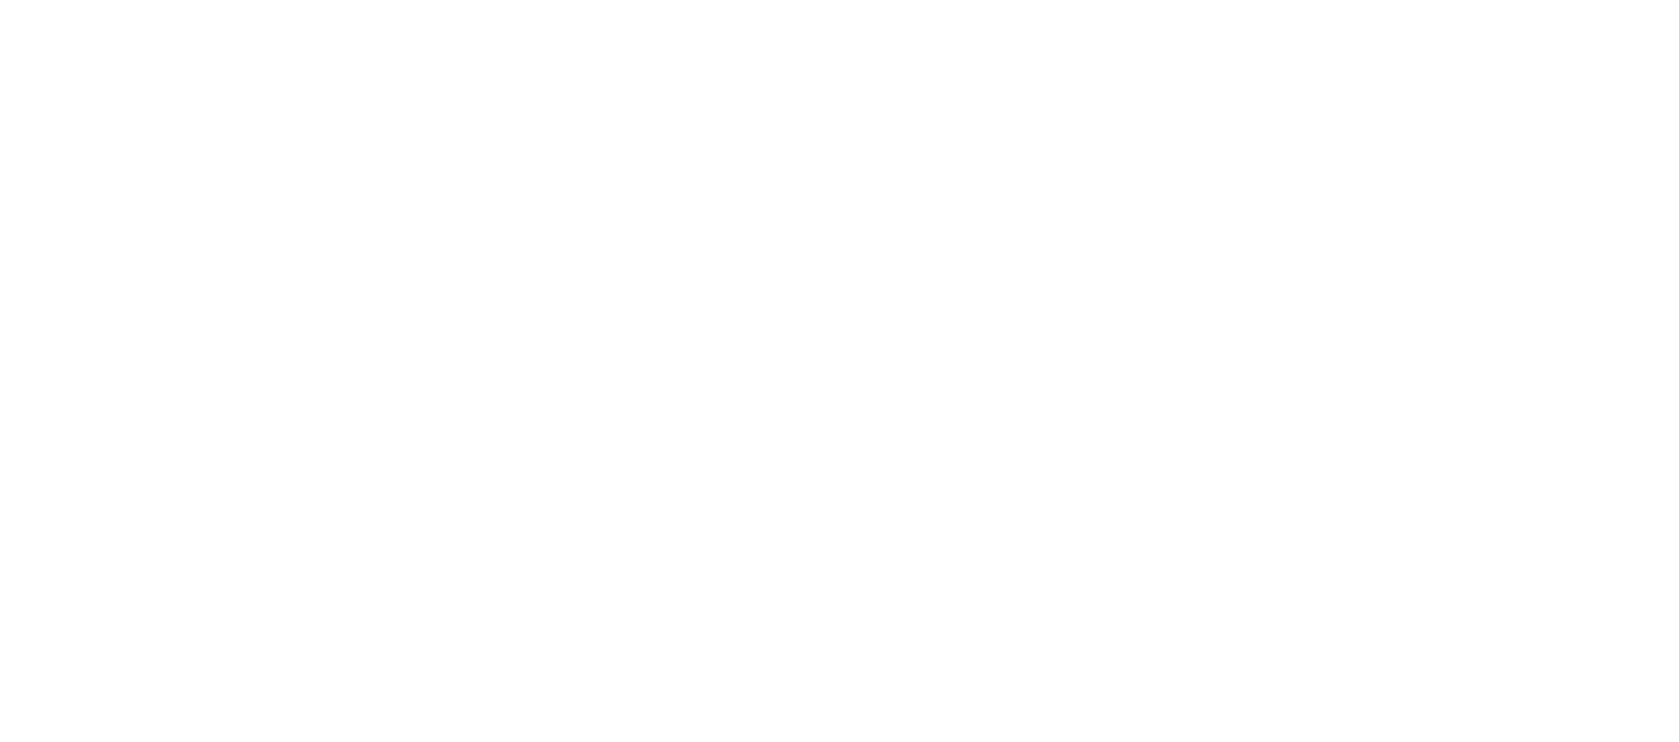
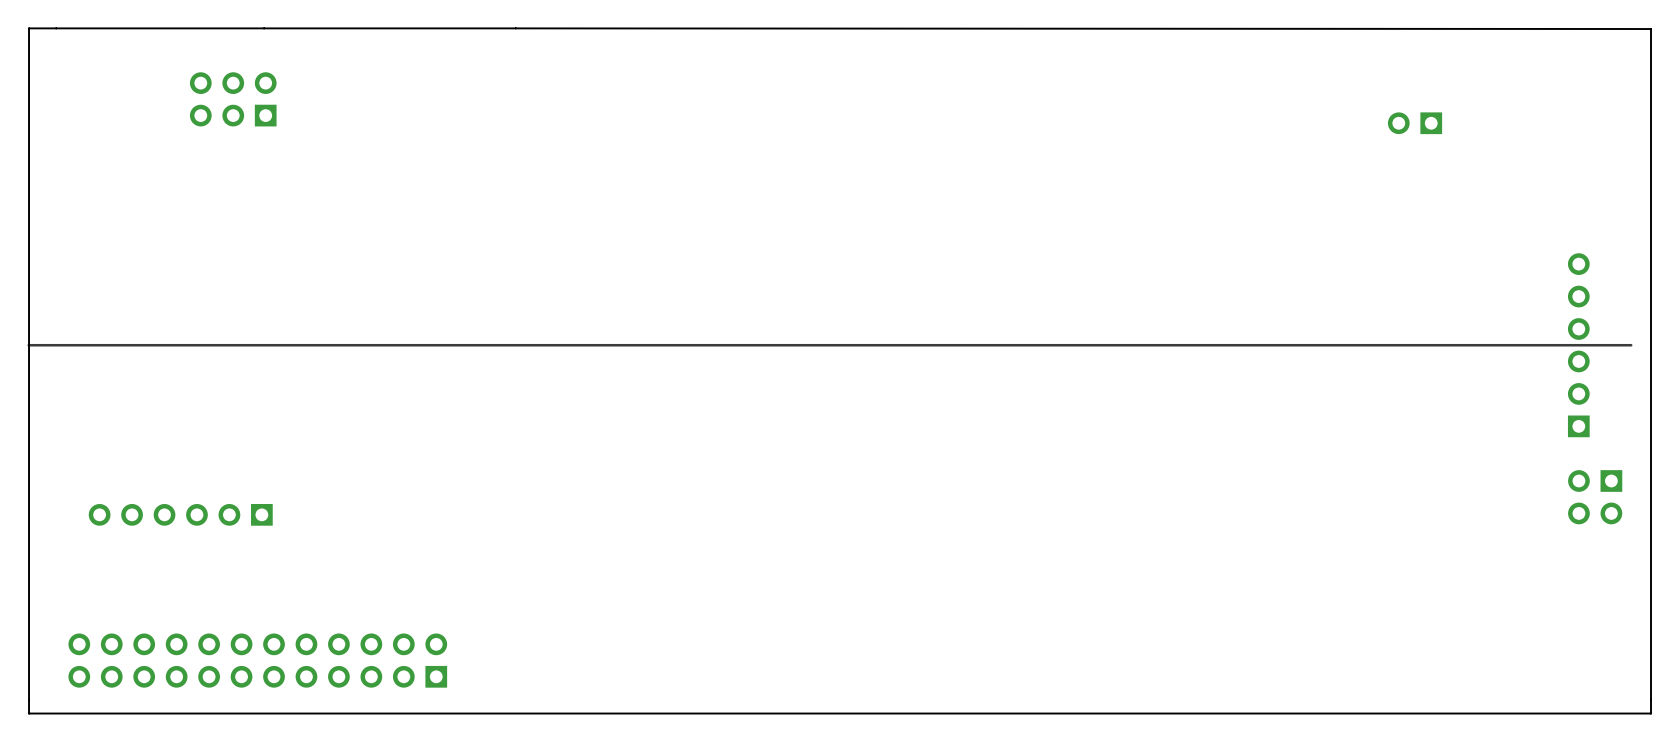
board edge: none -> (515, 28) (29, 28) (29, 713) (1651, 713) (1651, 29) (515, 28)
part: none -> (233, 99)
part: none -> (1415, 123)
part: none -> (1578, 345)
line: none -> (1631, 345) (28, 345)
part: none -> (1595, 497)
part: none -> (180, 514)
part: none -> (257, 660)

